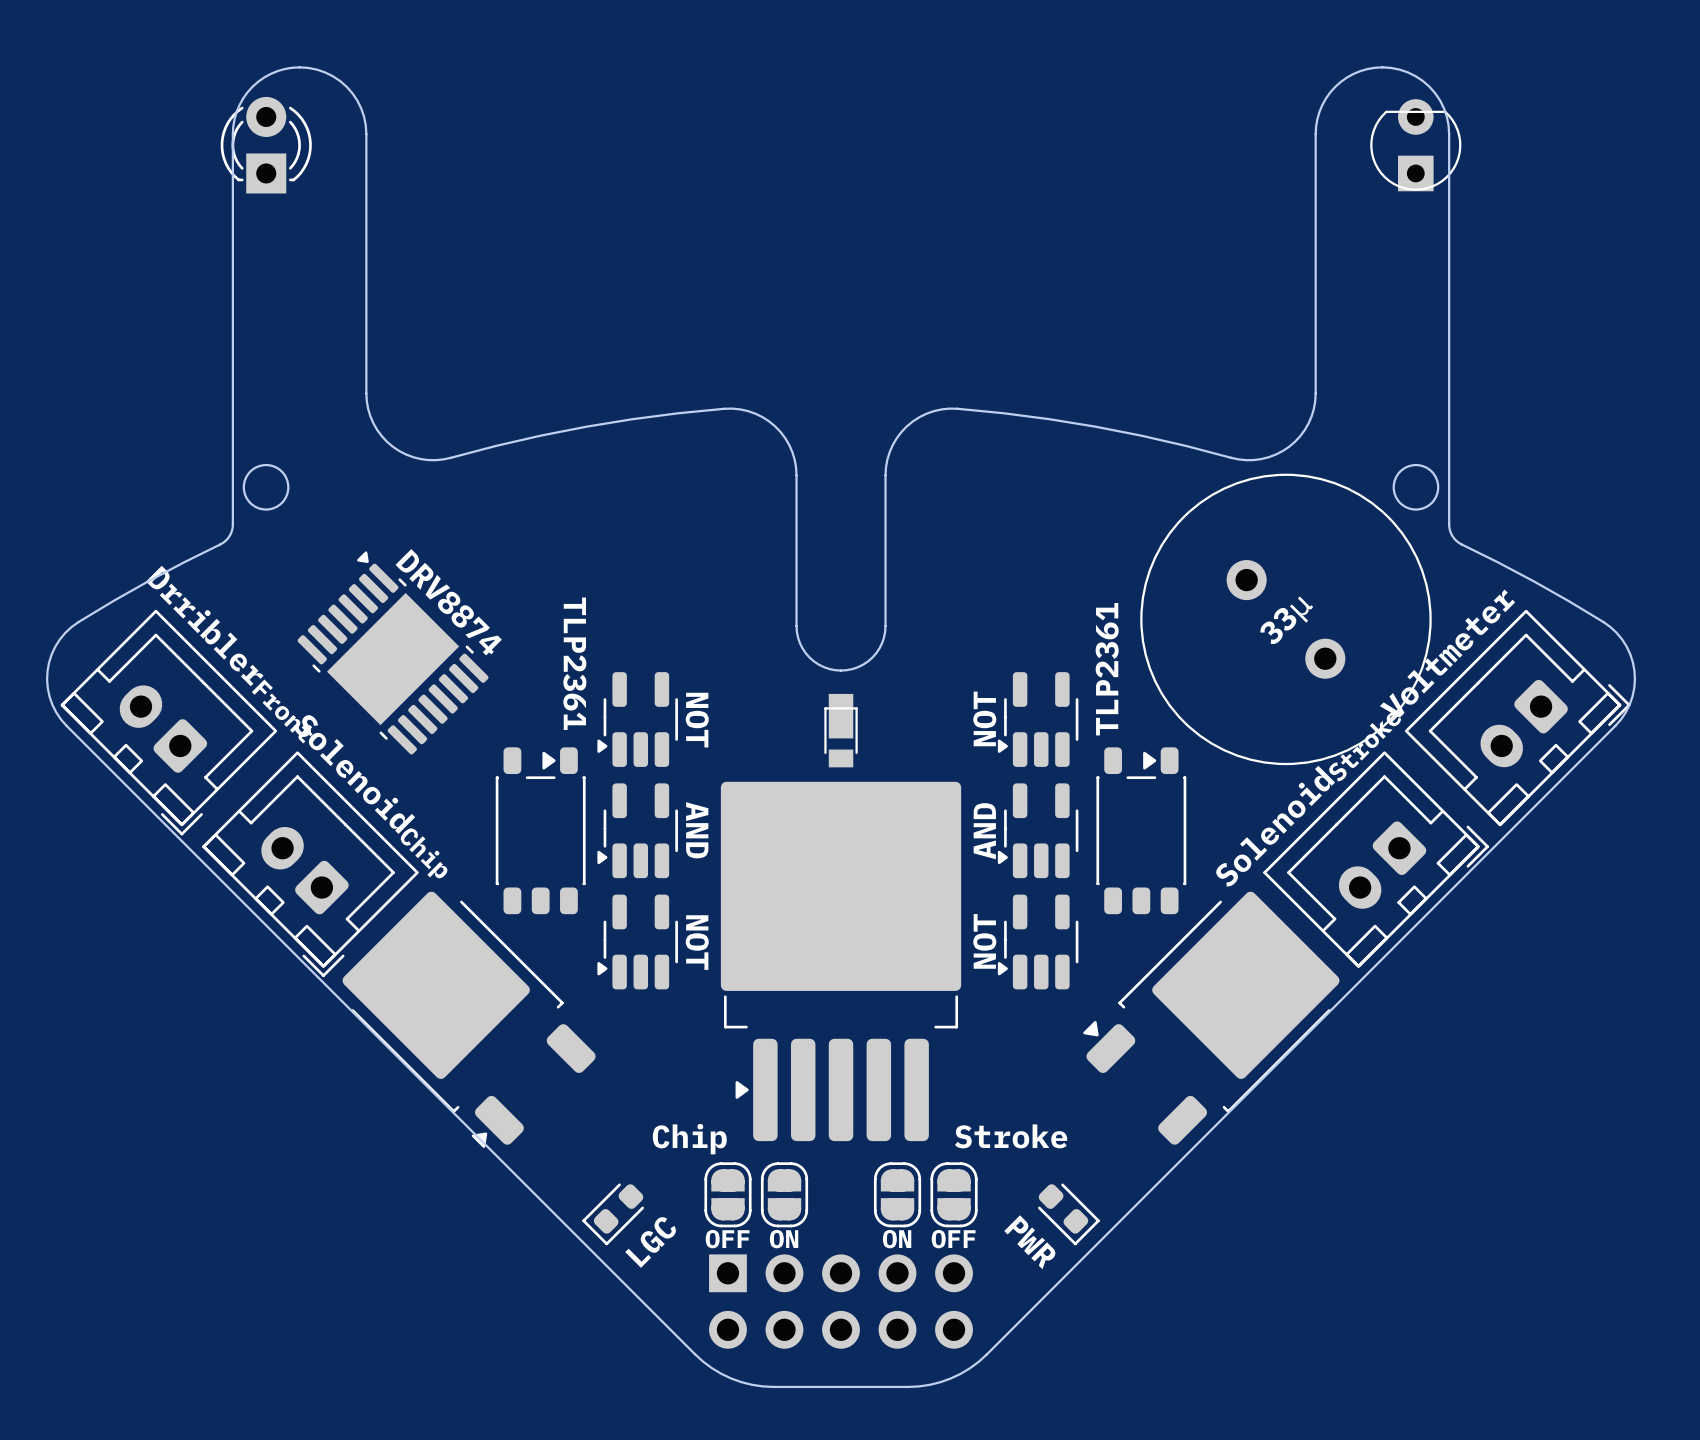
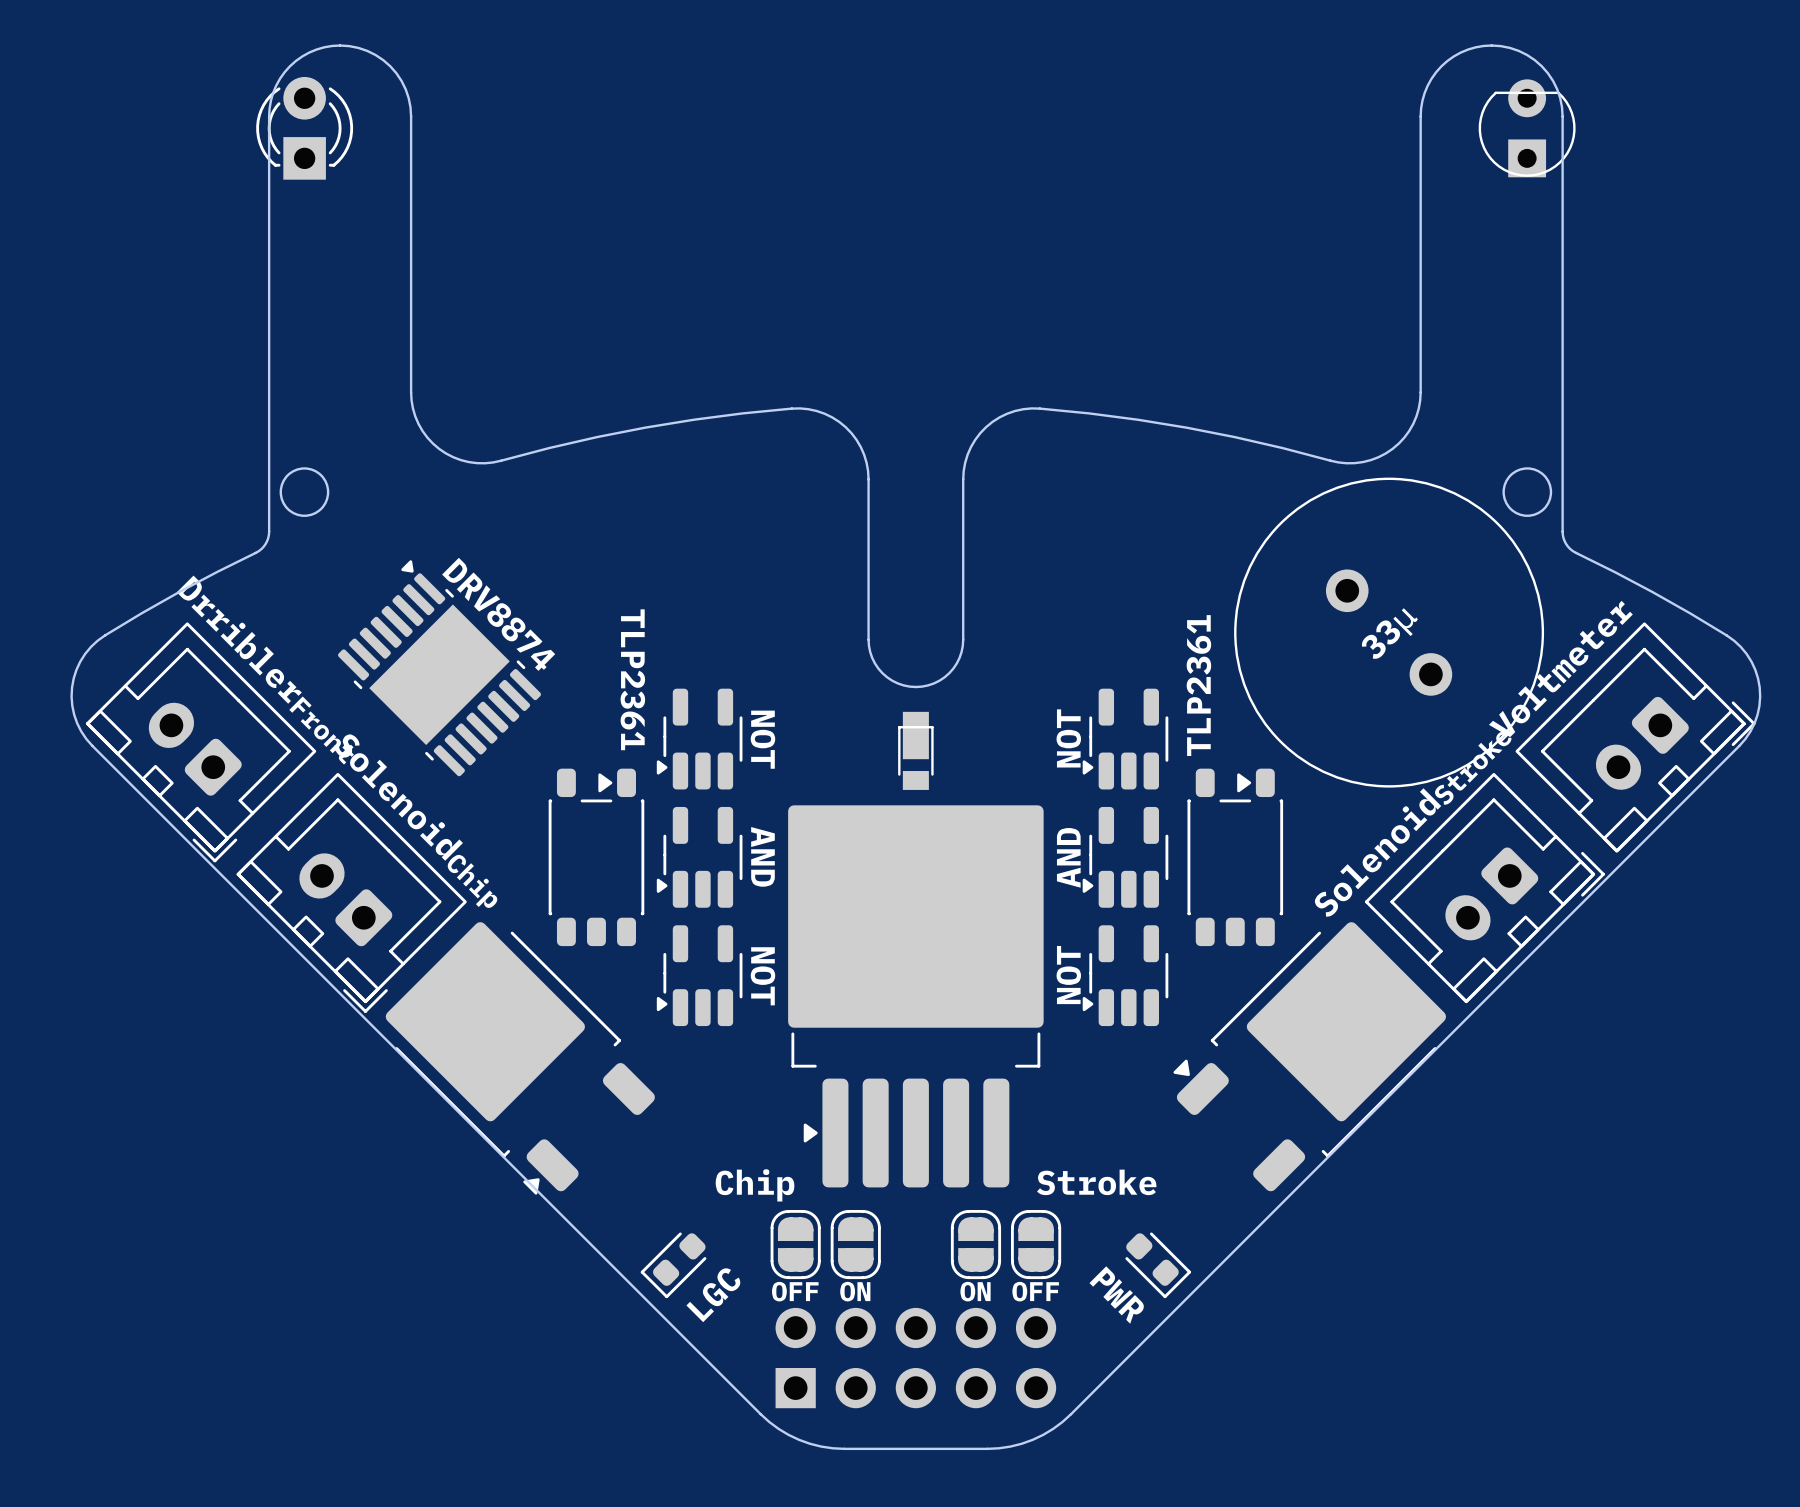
part footprint: [709, 1254, 973, 1349] -> [775, 1307, 1057, 1409]

